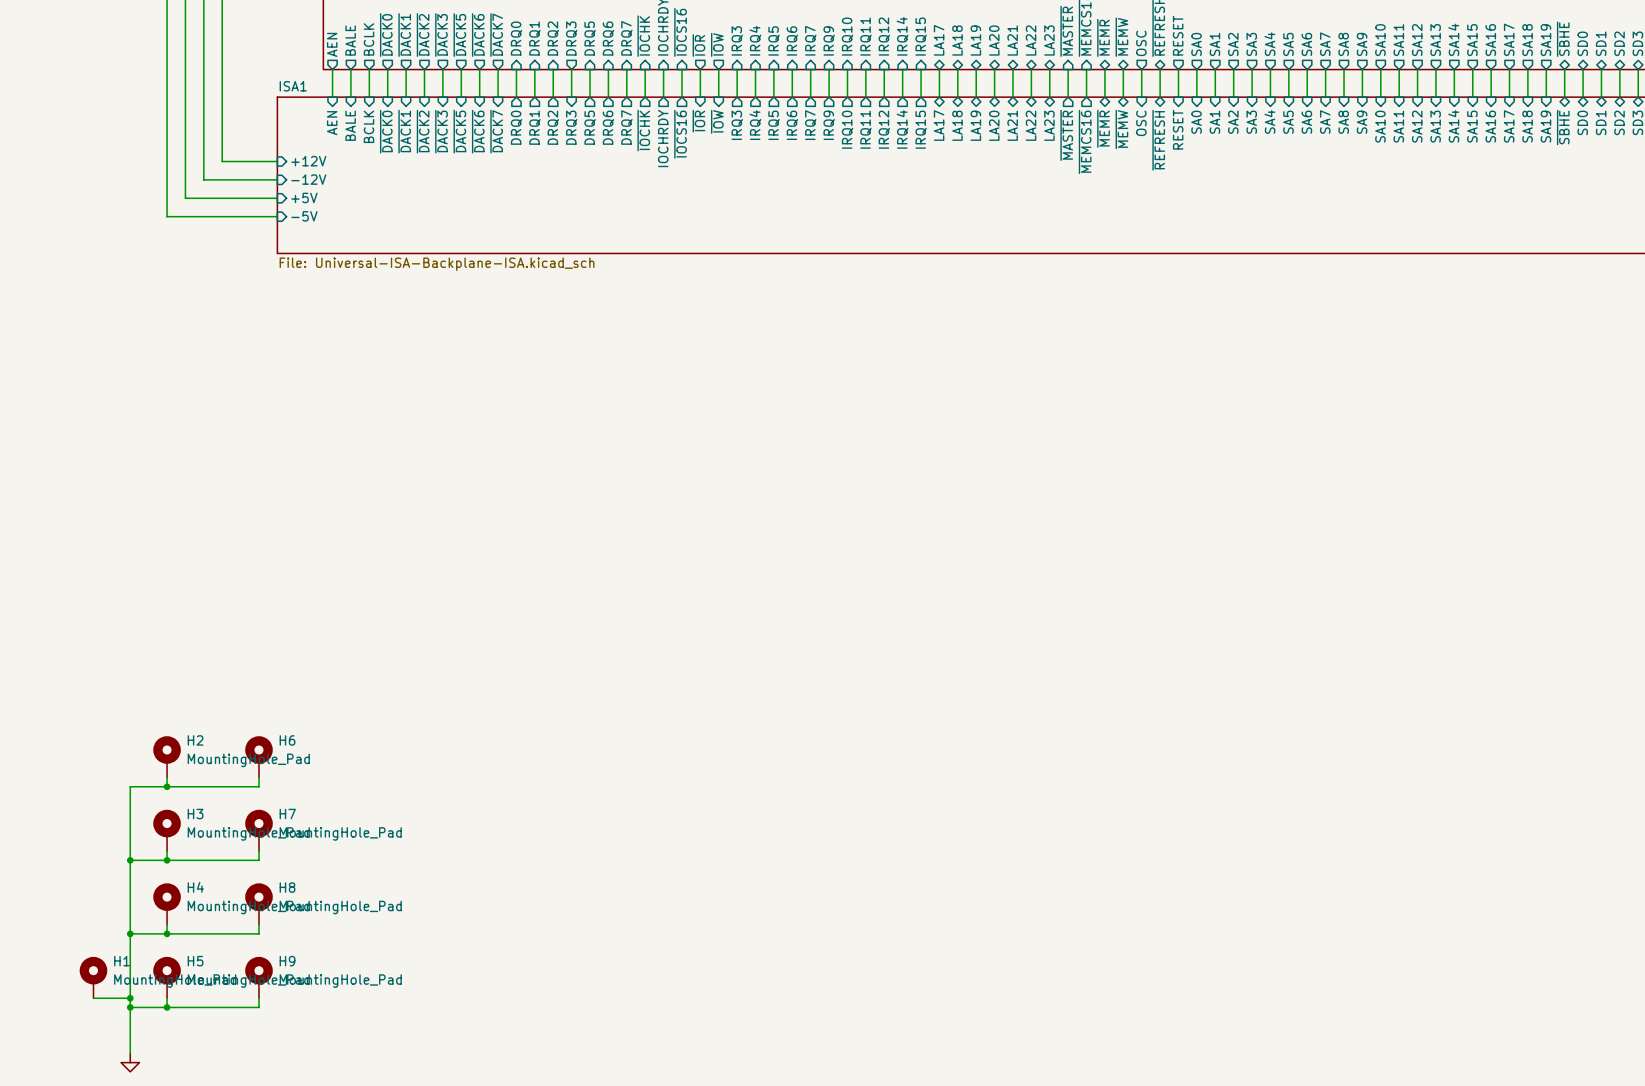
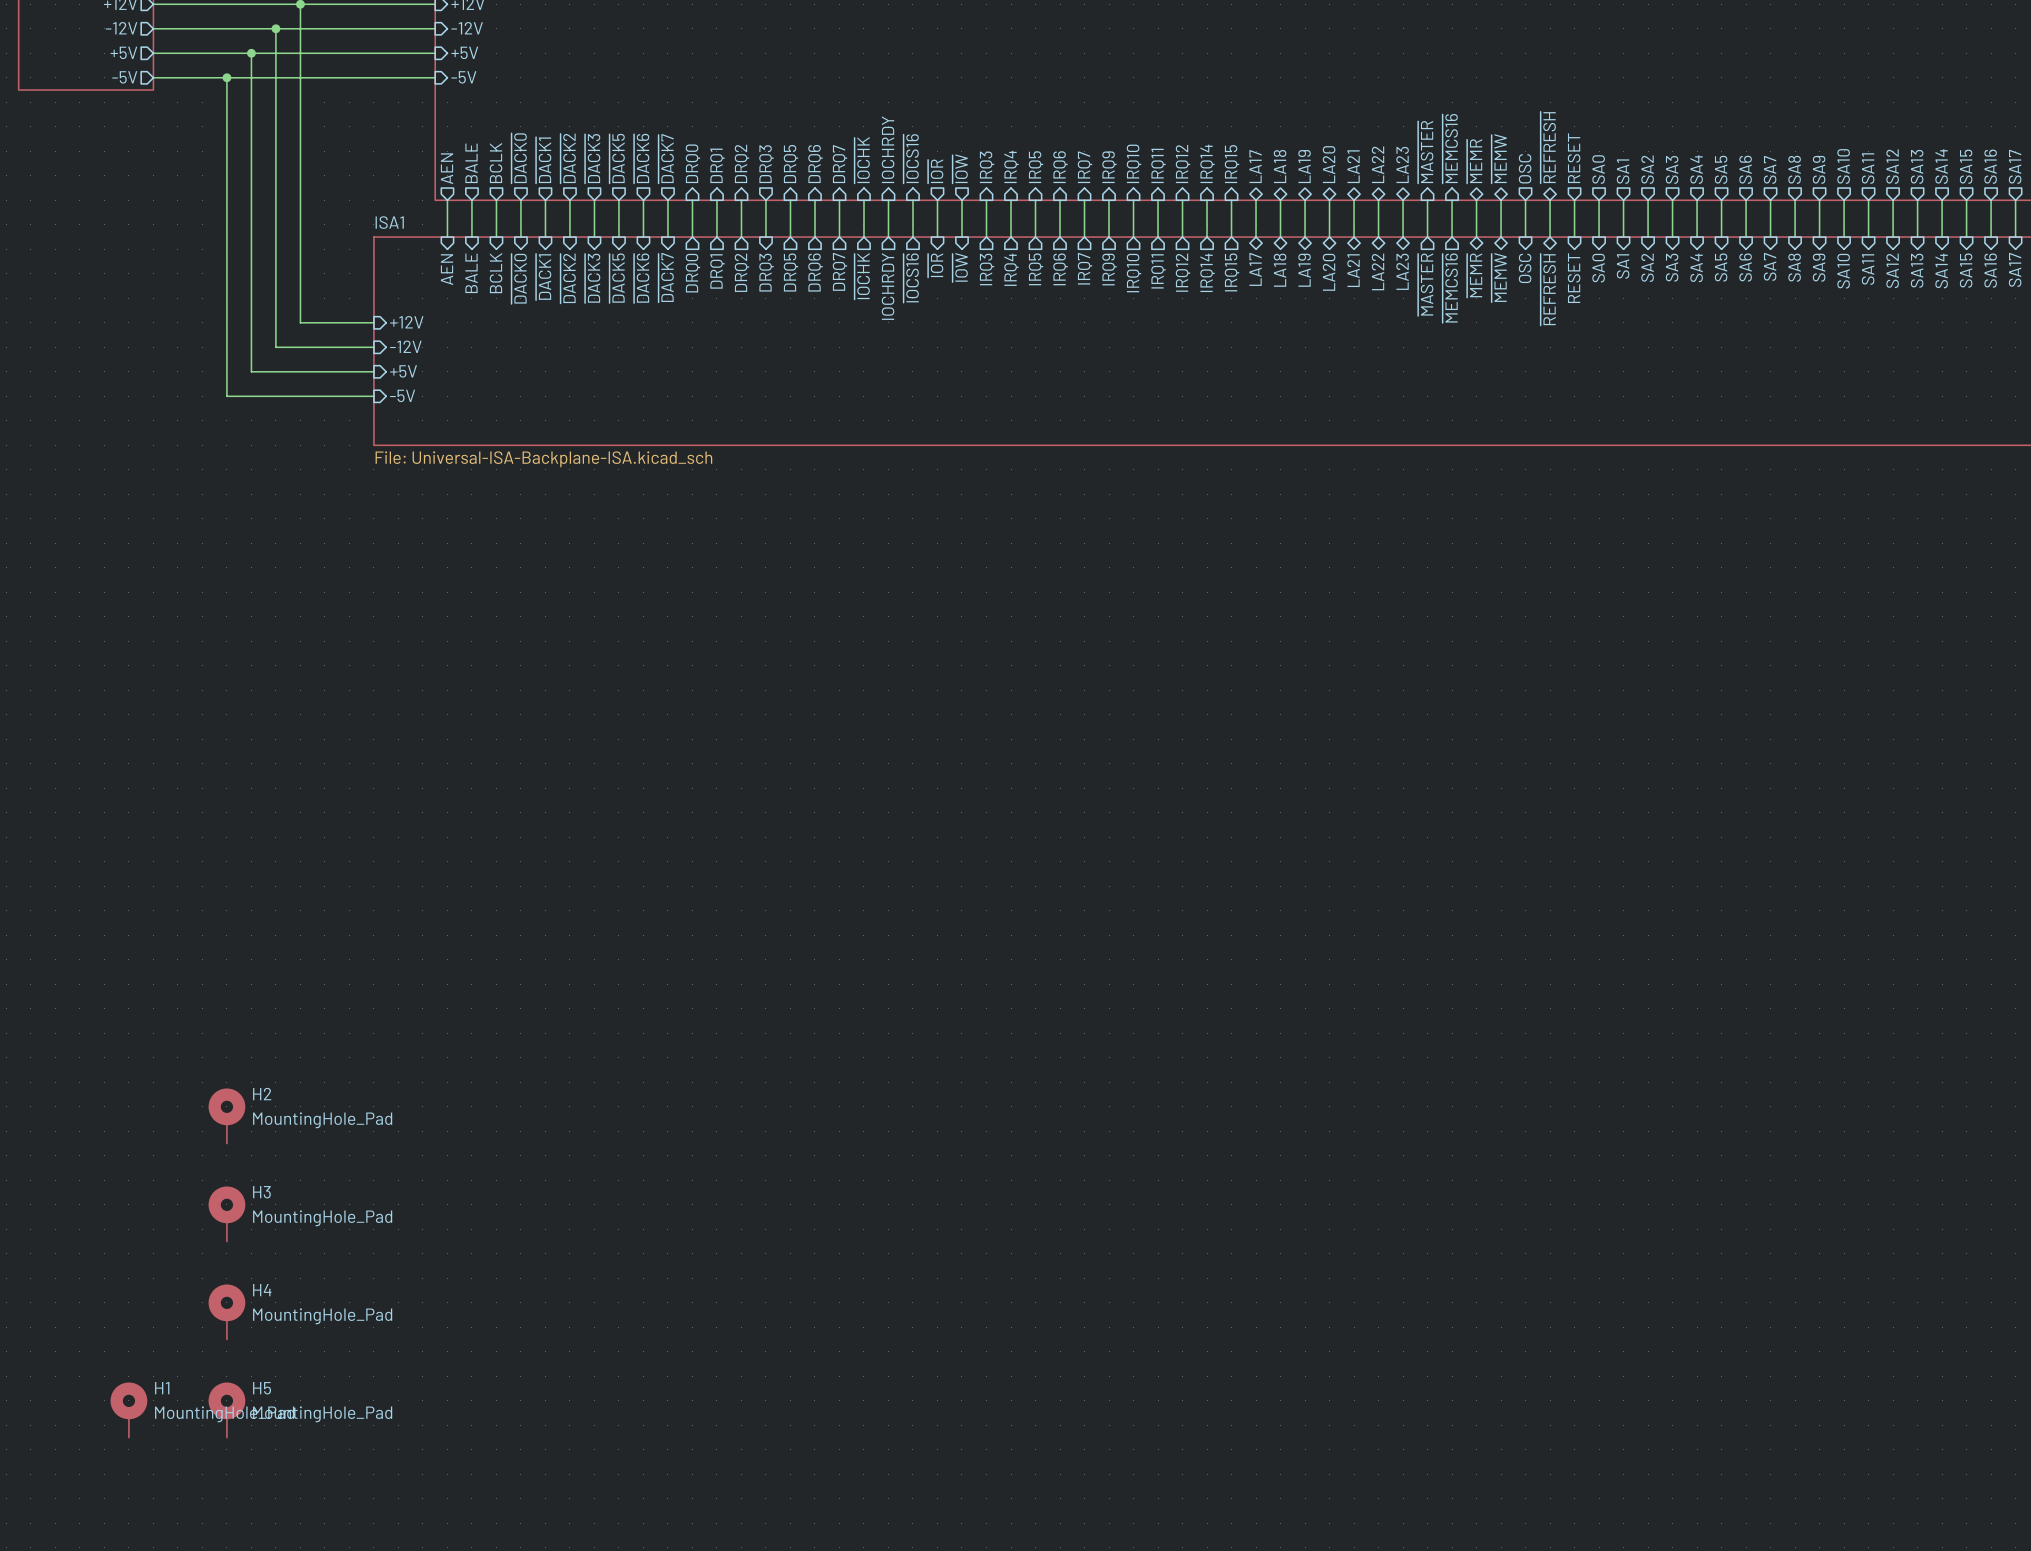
H6: (258, 756) -> none
wire: (167, 777) (167, 786) -> none
wire: (258, 777) (258, 786) (130, 786) (130, 1053) -> none
junction: (167, 786) -> none
H7: MountingHole_Pad (258, 830) -> none
wire: (167, 851) (167, 860) -> none
wire: (258, 851) (258, 860) (130, 860) -> none
junction: (130, 860) -> none
junction: (167, 860) -> none
H8: MountingHole_Pad (258, 904) -> none
wire: (167, 924) (167, 933) -> none
wire: (258, 924) (258, 933) (130, 933) -> none
junction: (130, 933) -> none
junction: (167, 933) -> none
H9: MountingHole_Pad (258, 977) -> none
wire: (93, 998) (130, 998) -> none
junction: (130, 998) -> none
wire: (167, 998) (167, 1007) -> none
wire: (258, 998) (258, 1007) (130, 1007) -> none
junction: (130, 1007) -> none
junction: (167, 1007) -> none
power symbol: (130, 1062) -> none

